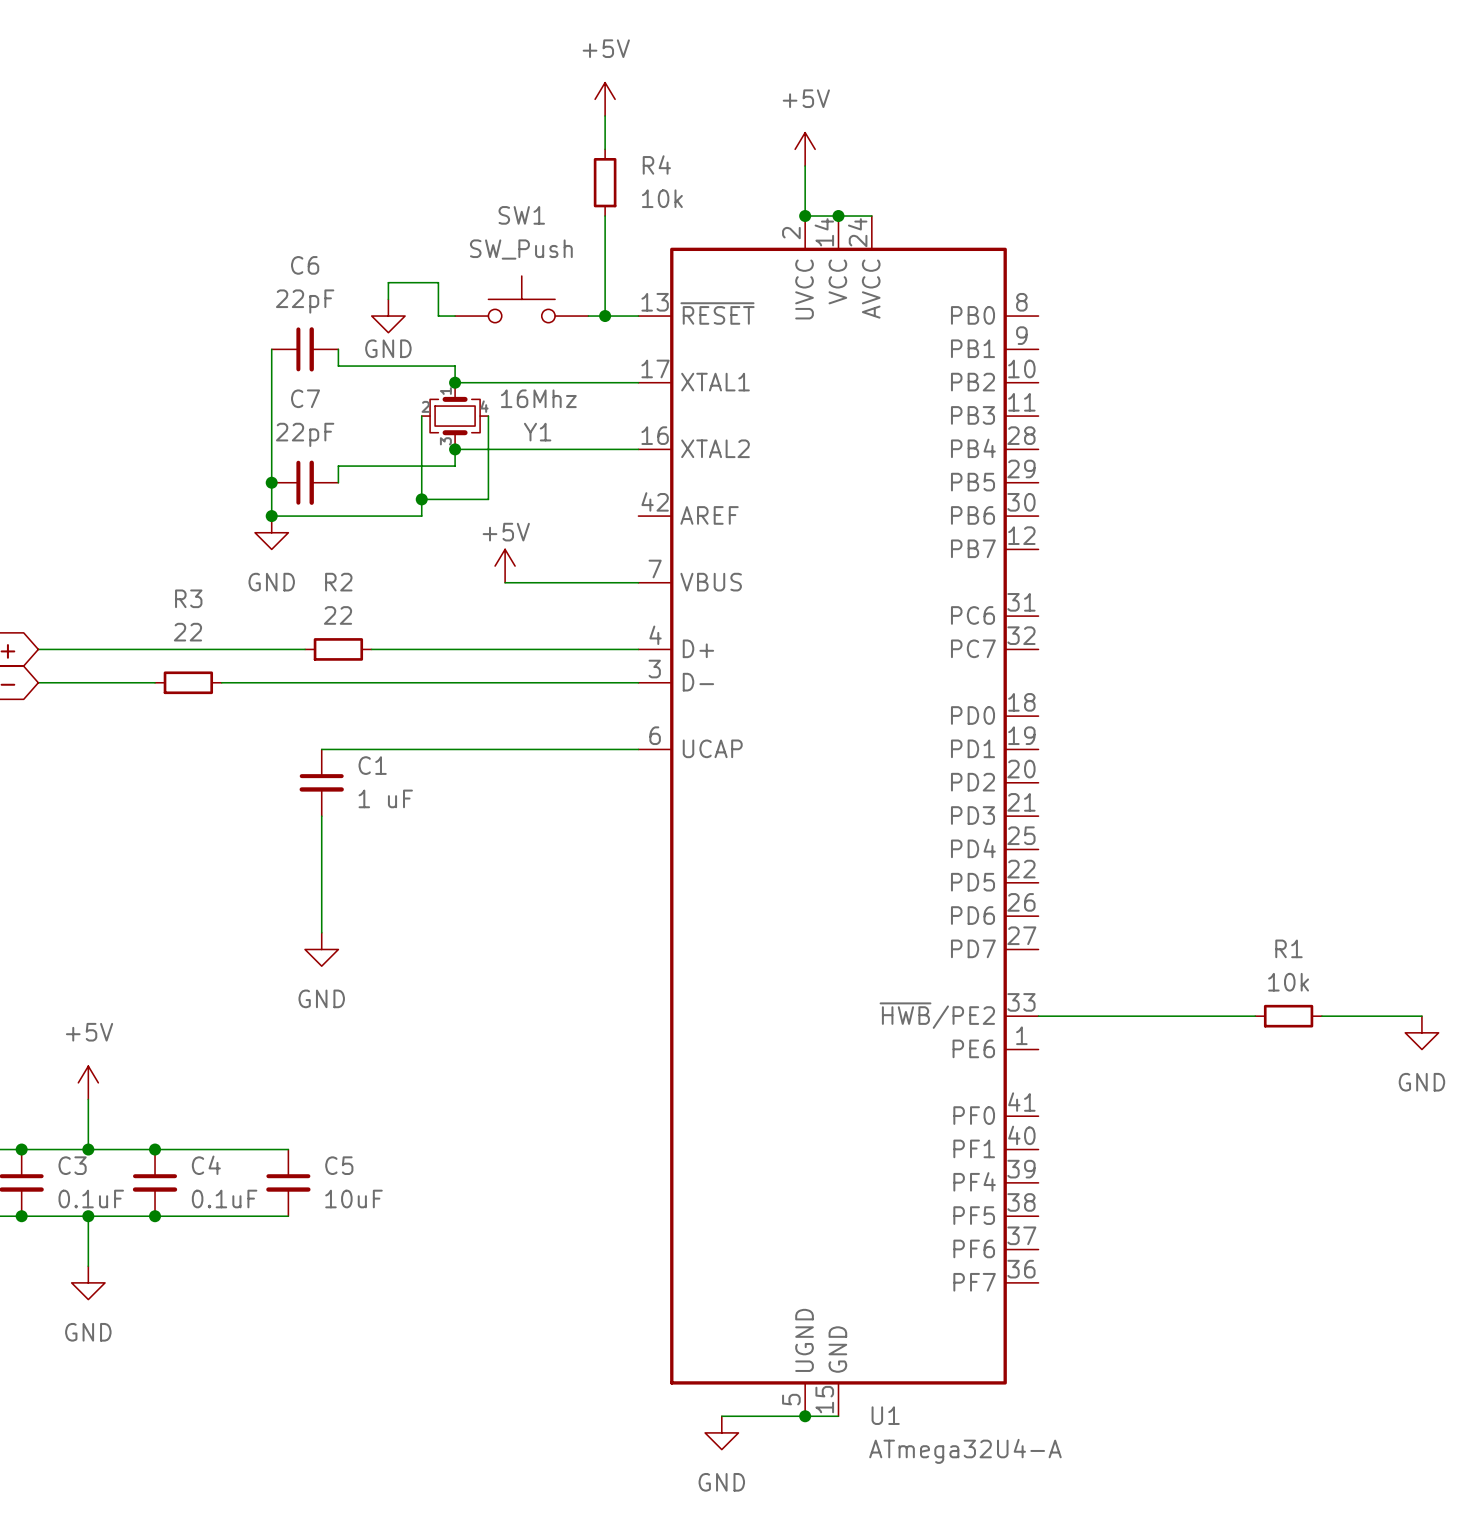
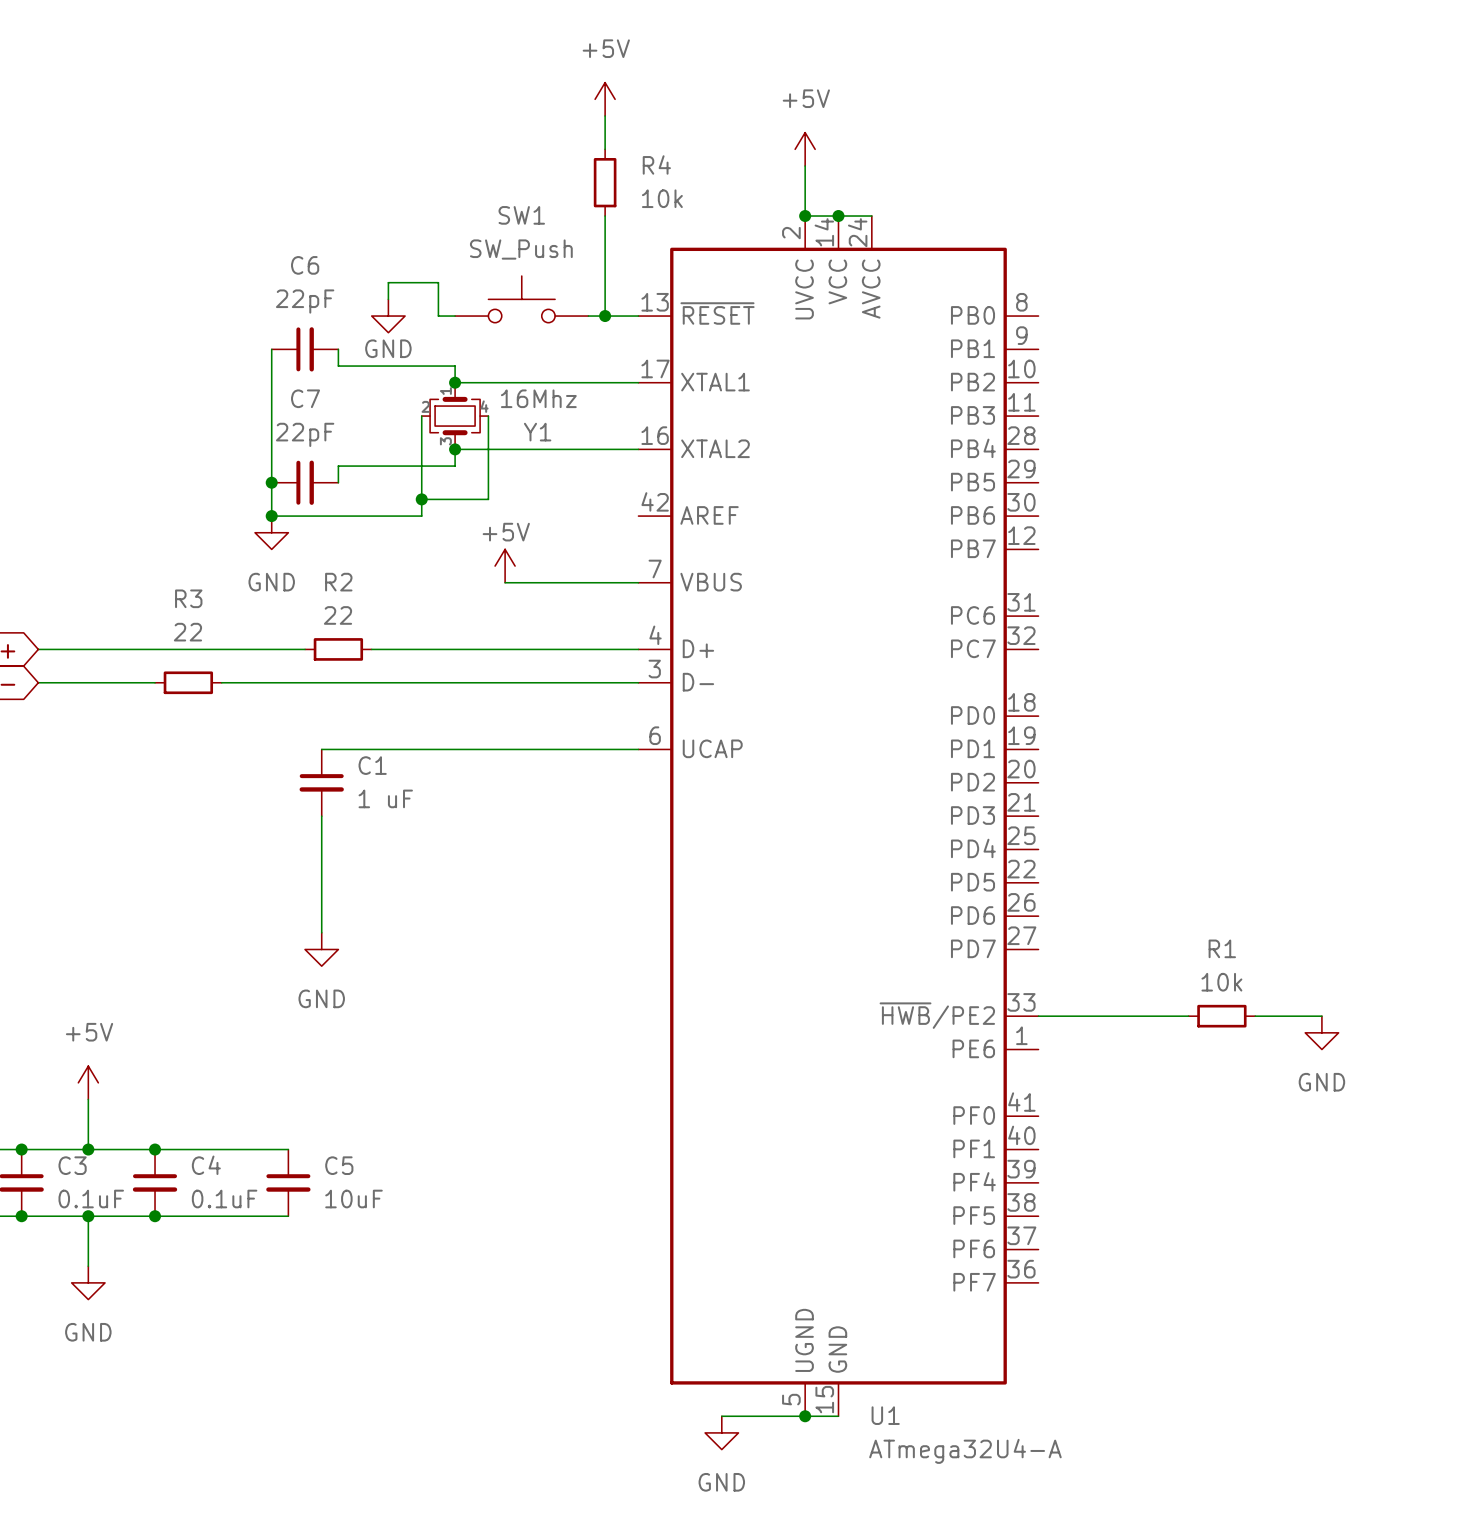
wire: (1188, 1016) (1255, 1016) -> (1321, 1016) (1255, 1016)
R1 position: (1288, 1016) -> (1221, 1016)
wire: (1321, 1016) (1421, 1016) -> none
power symbol position: GND (1421, 1032) -> GND (1321, 1032)

